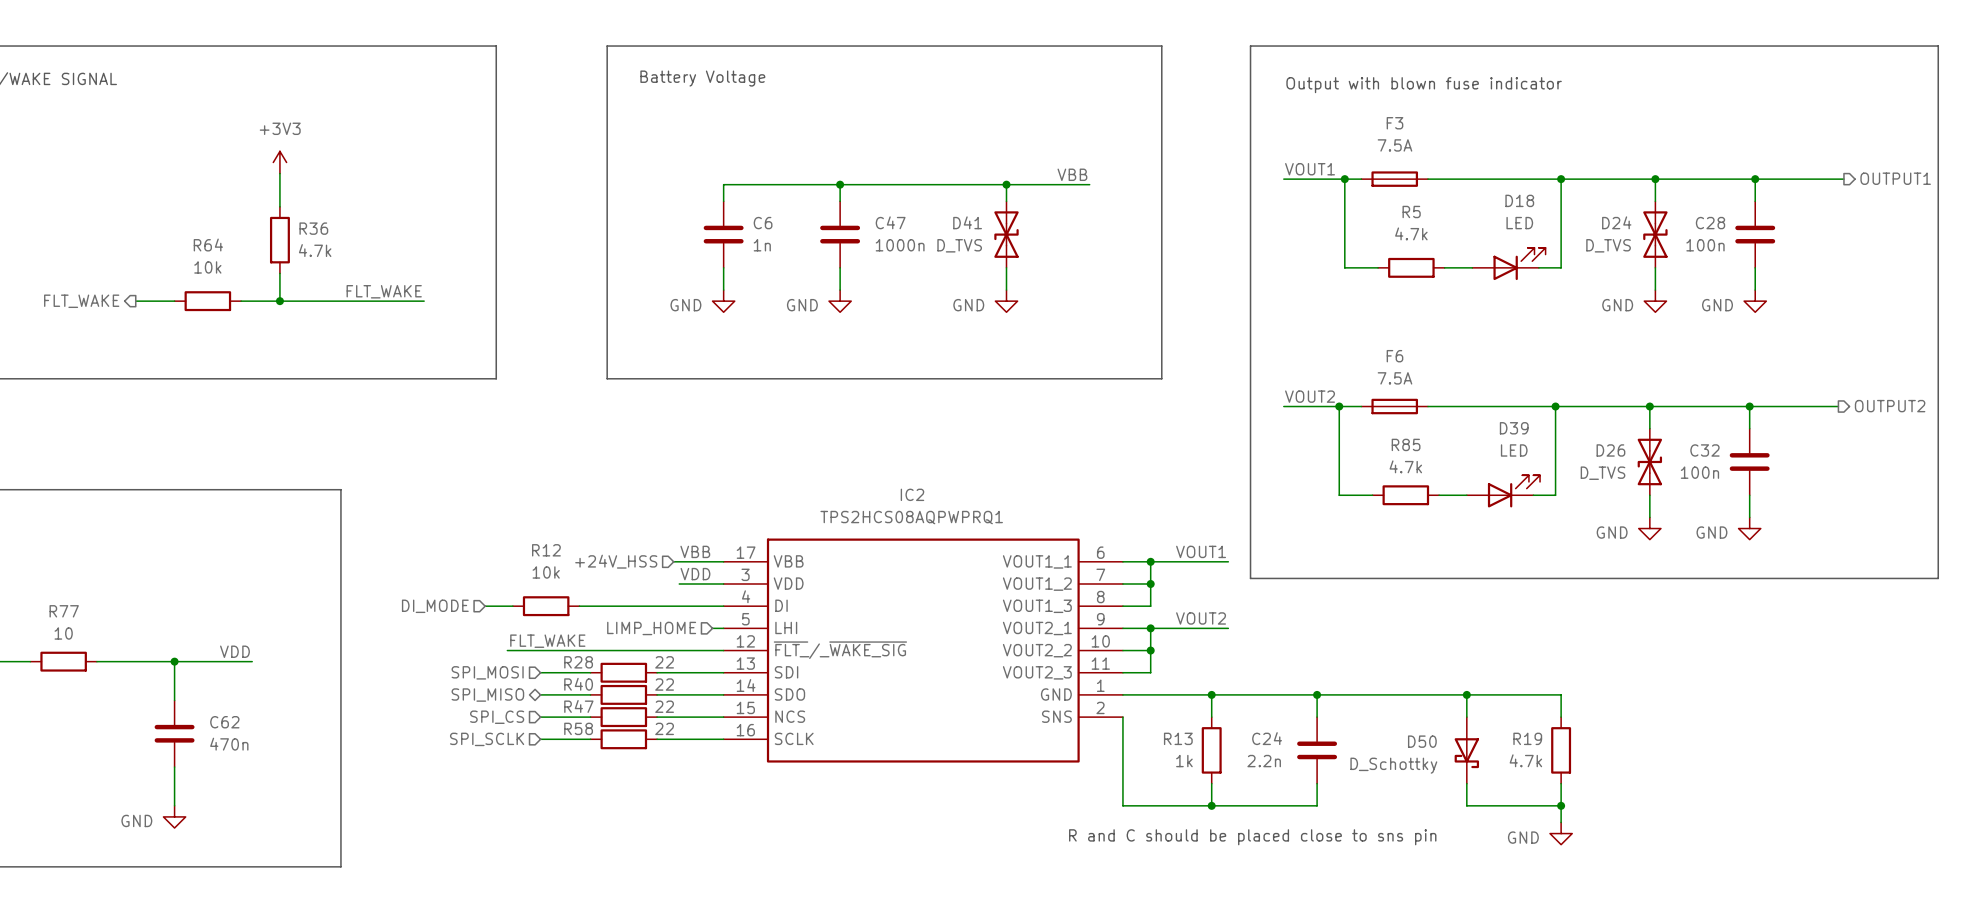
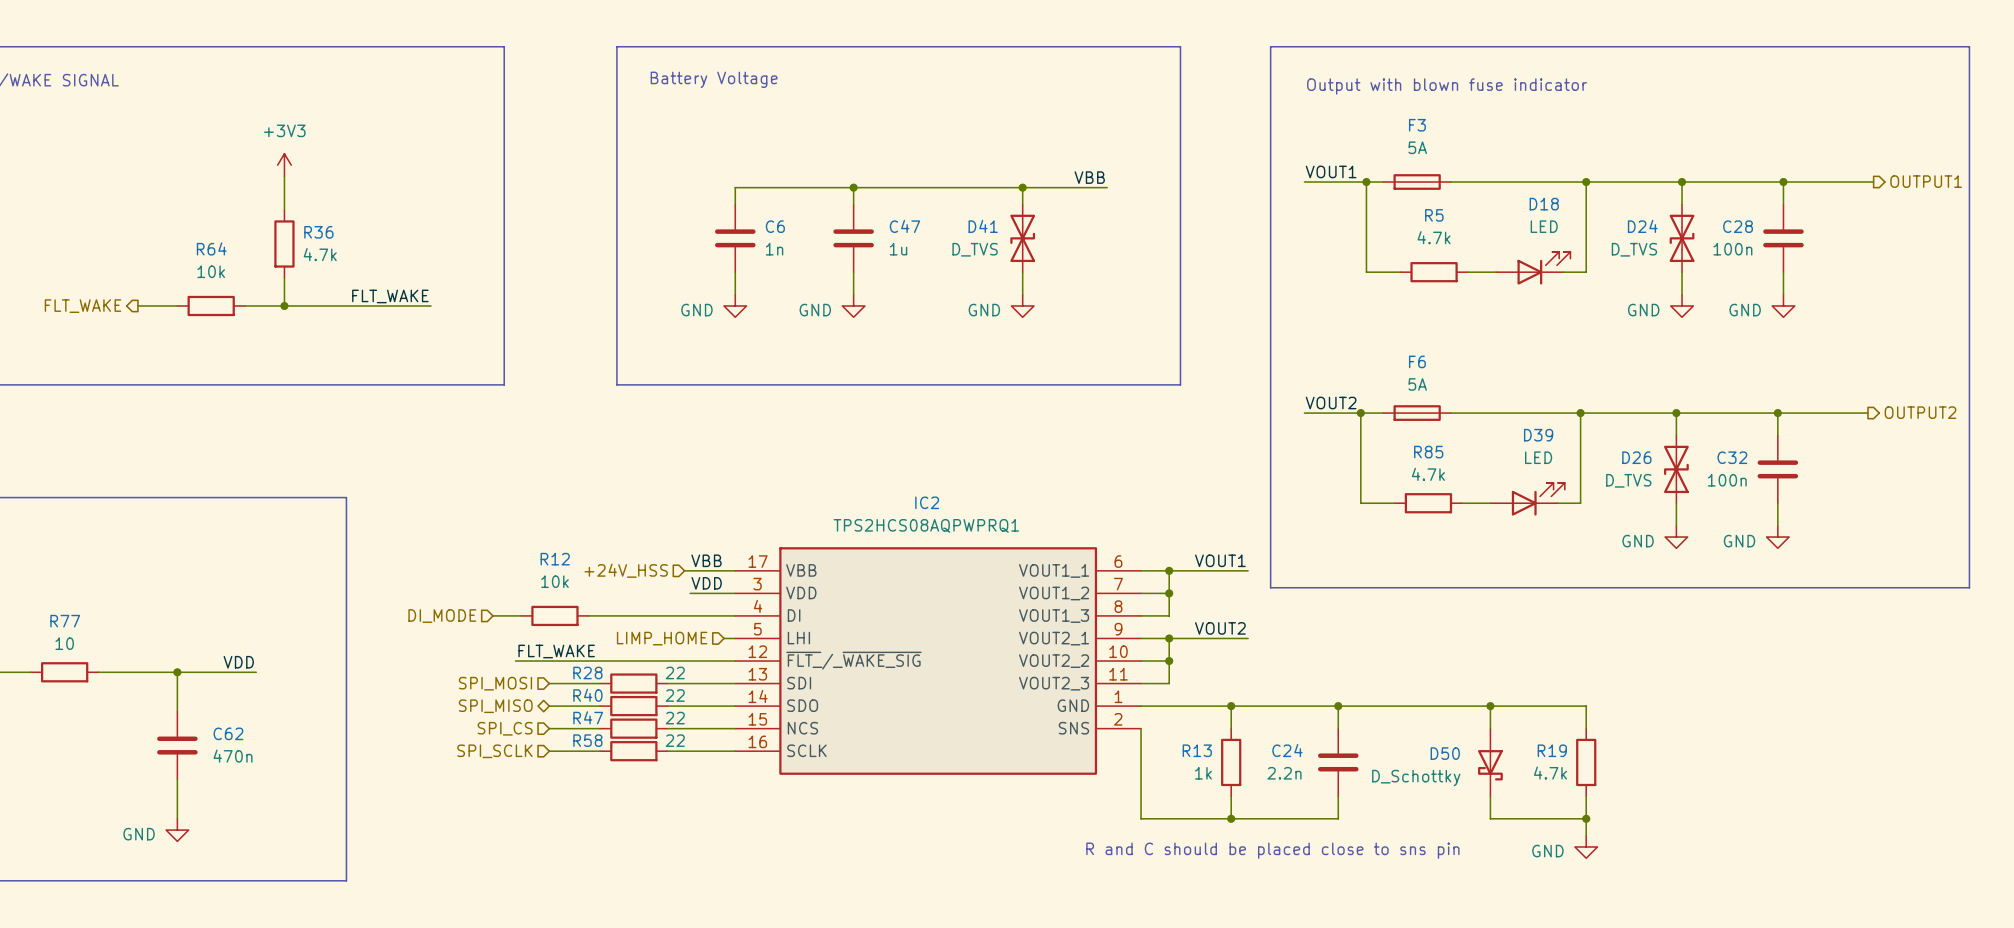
F3 value: 7.5A (1394, 145) -> 5A (1417, 147)
C47 value: 1000n (900, 245) -> 1u (898, 249)
F6 value: 7.5A (1394, 378) -> 5A (1417, 384)

